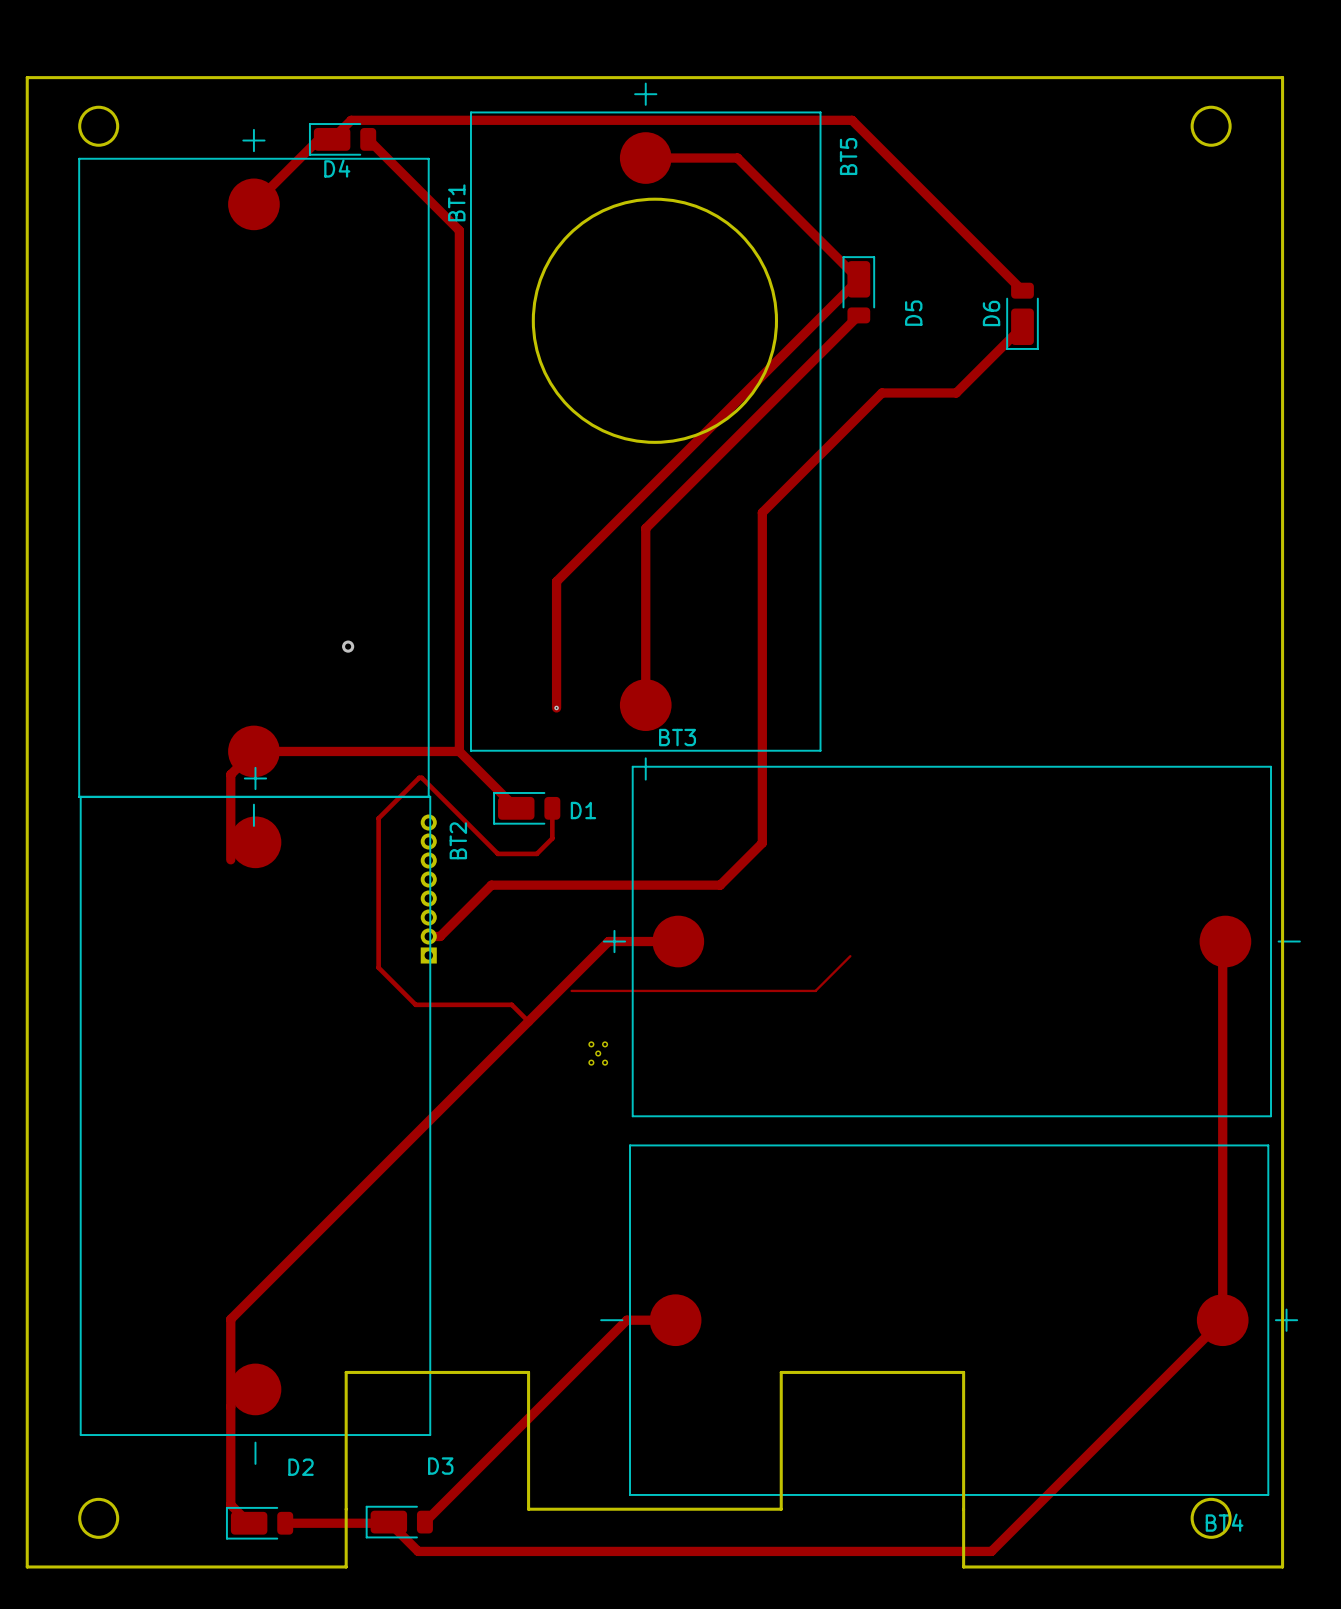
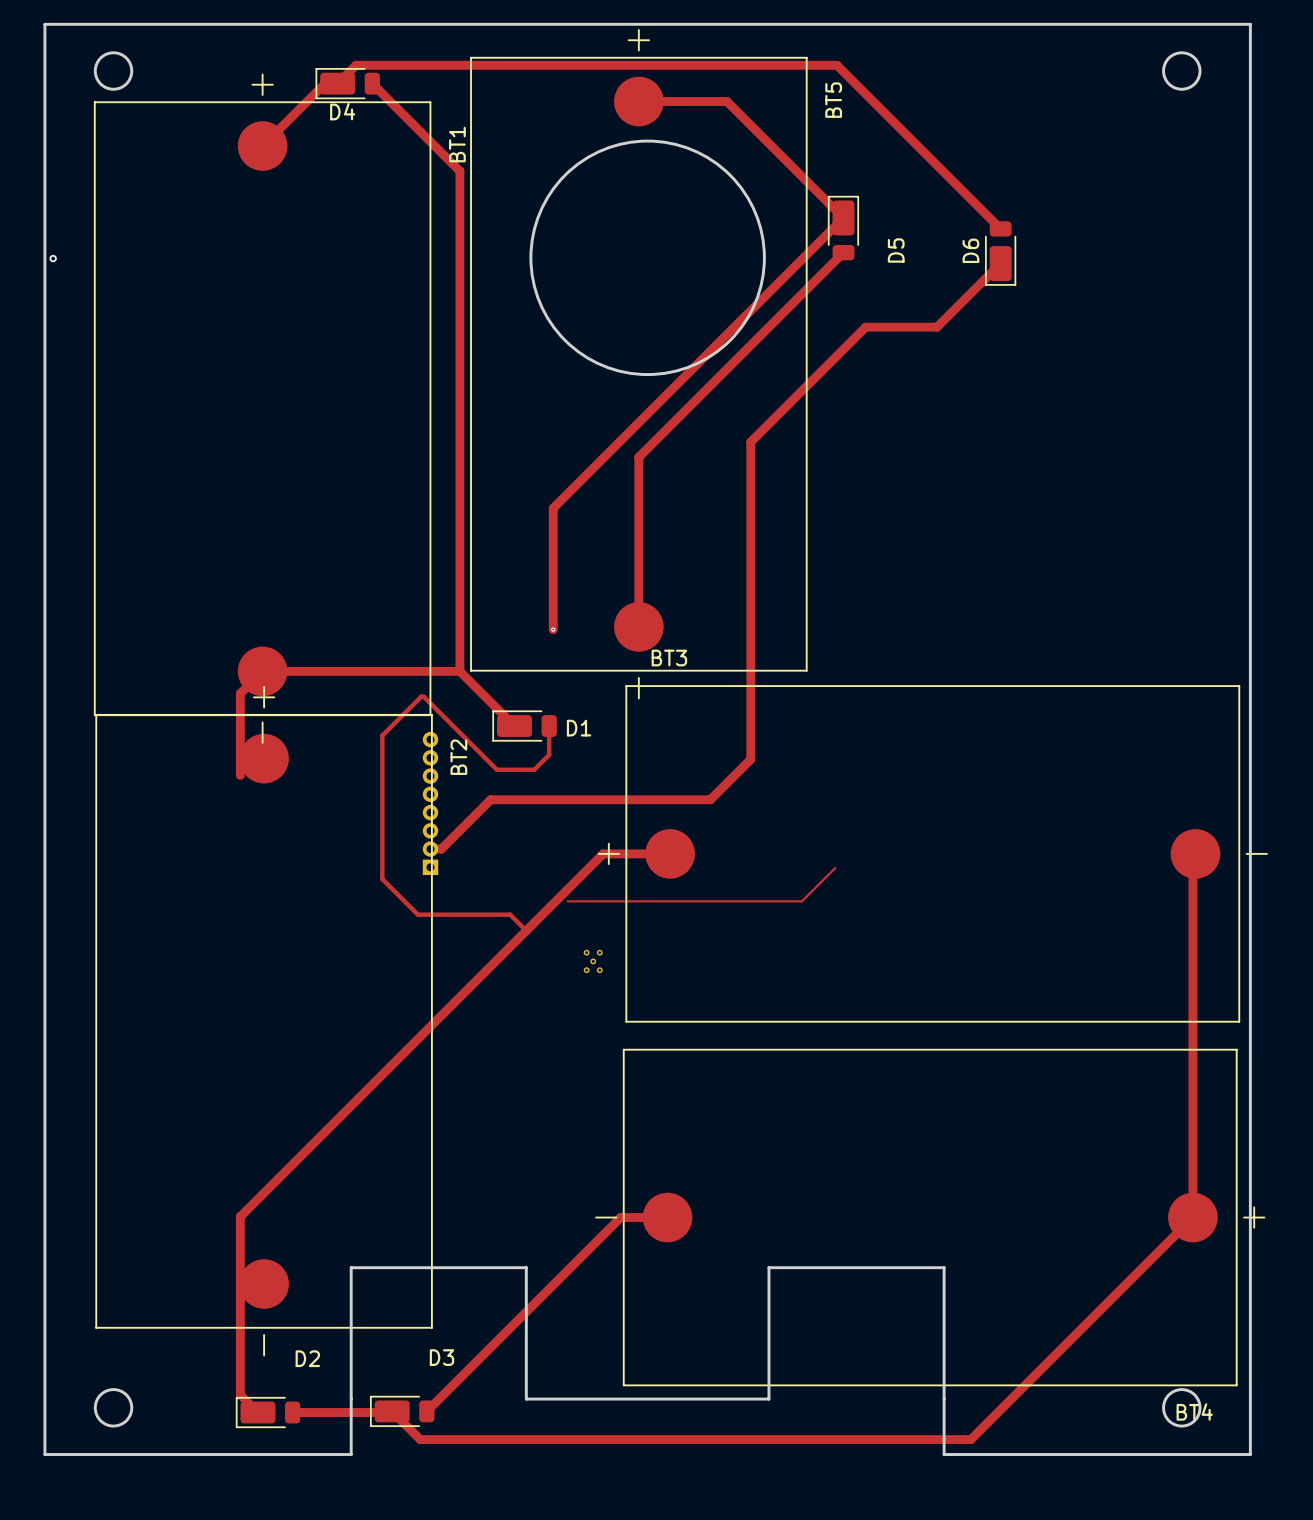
via: none -> (53, 258)
via: (348, 646) -> none

